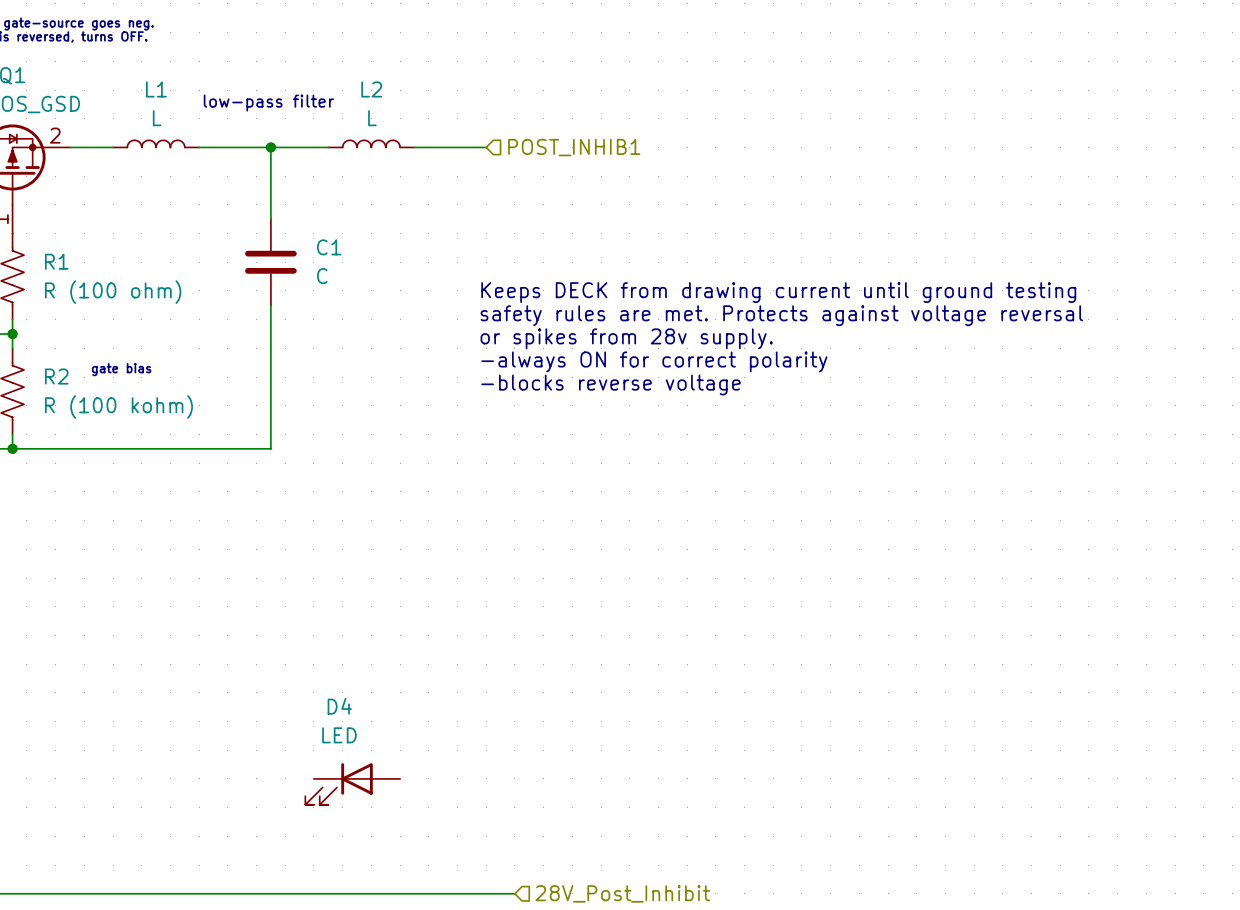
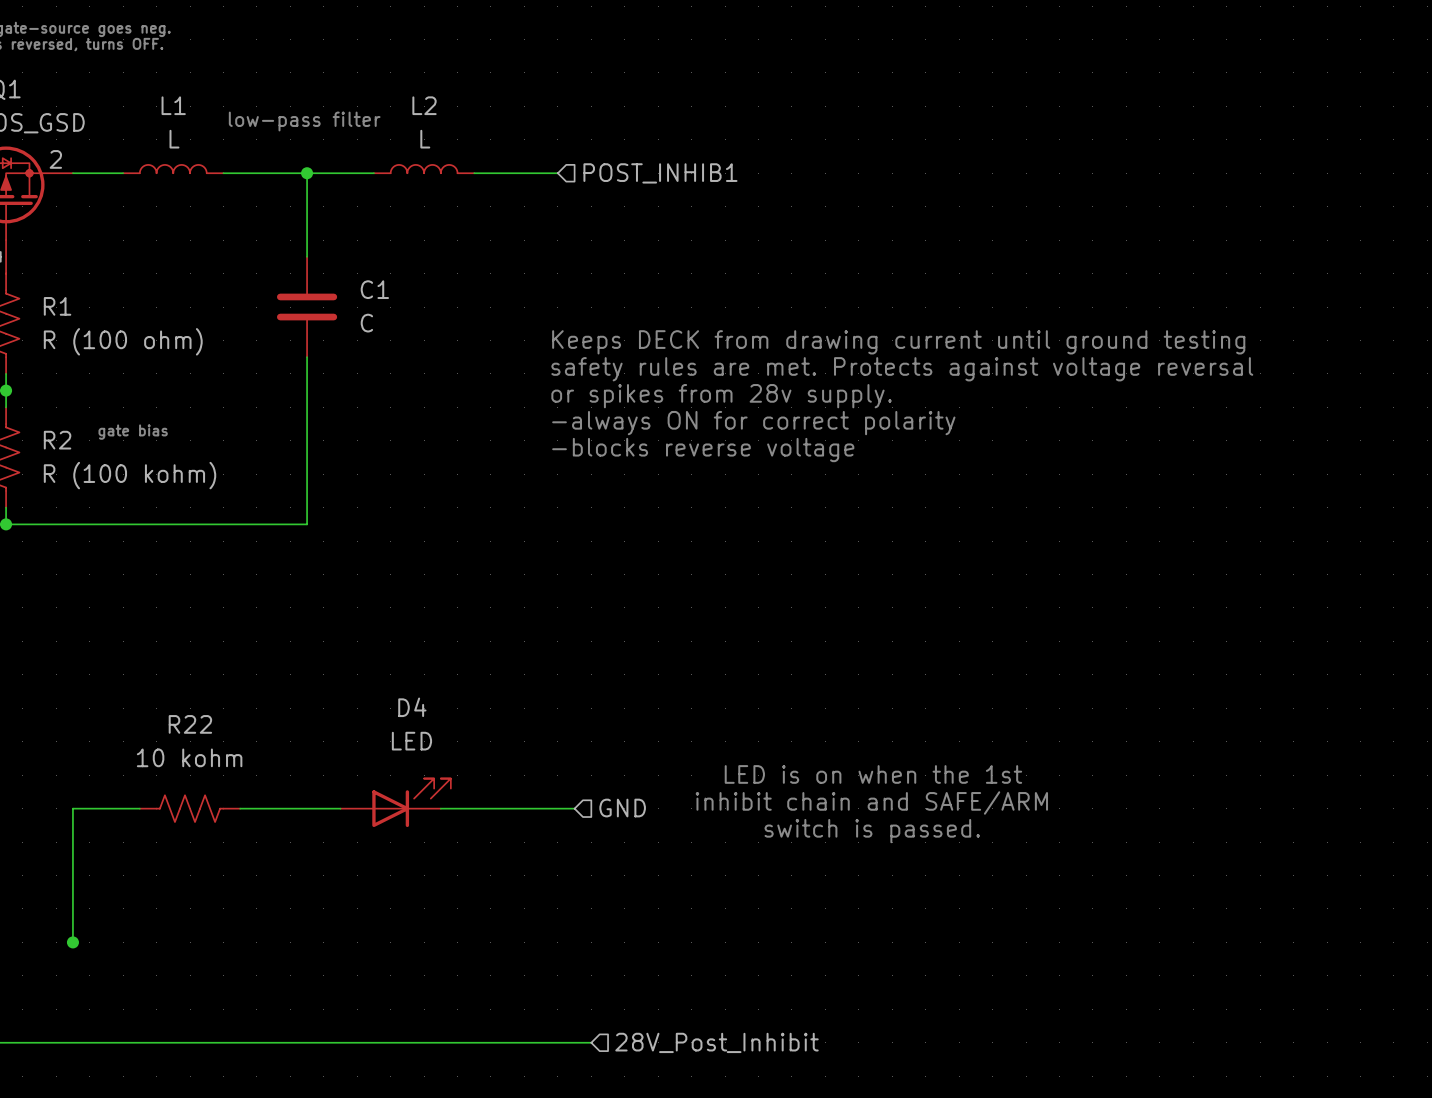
text: none -> LED is on when the 1st (873, 774)
text: none -> inhibit chain and SAFE/ARM (871, 802)
wire: none -> (139, 808) (72, 808) (72, 942)
R22: none -> 10 kohm (190, 808)
wire: none -> (240, 808) (340, 808)
wire: none -> (440, 808) (574, 808)
hierarchical label: none -> GND (622, 808)
D4 name position: D4 (339, 706) -> D4 (412, 707)
text: none -> switch is passed. (872, 831)
D4 value position: LED (339, 735) -> LED (411, 741)
D4 rotation: 0° (339, 783) -> 180° (411, 802)
D4 position: (352, 783) -> (395, 802)
junction: none -> (72, 942)

